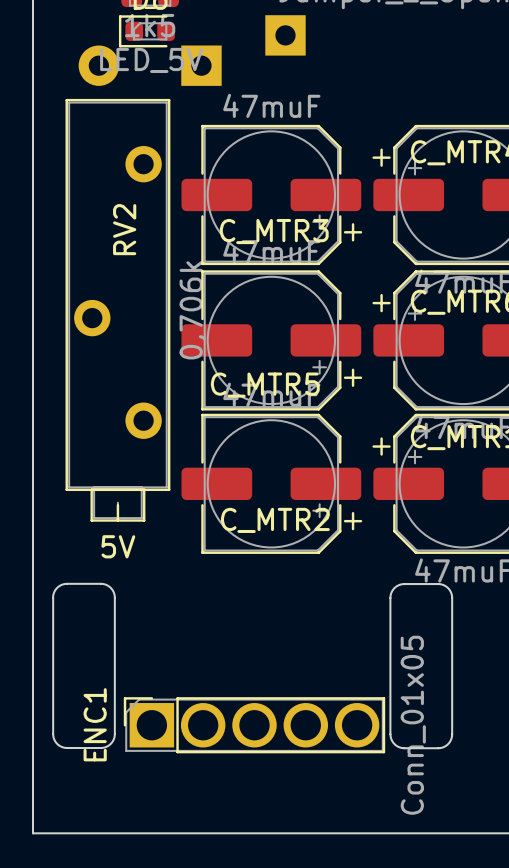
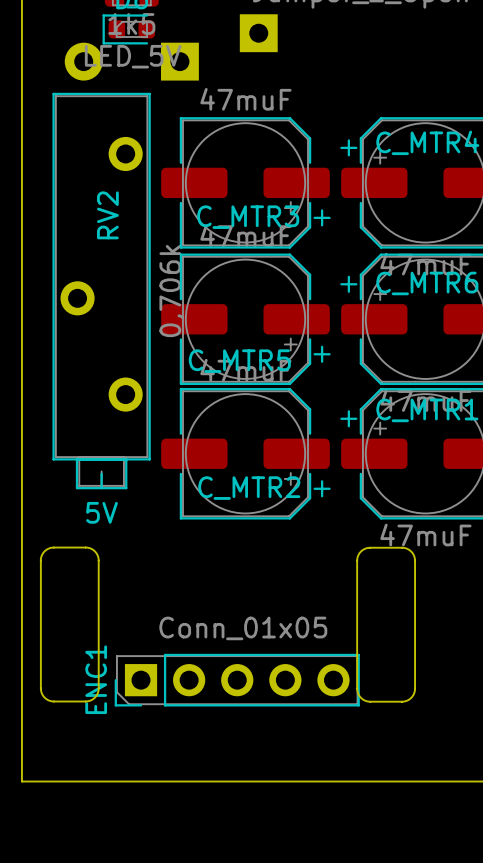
ENC1 footprint: [123, 697, 386, 754] -> [114, 653, 360, 707]
ENC1 value position: Conn_01x05 (413, 725) -> Conn_01x05 (243, 628)

